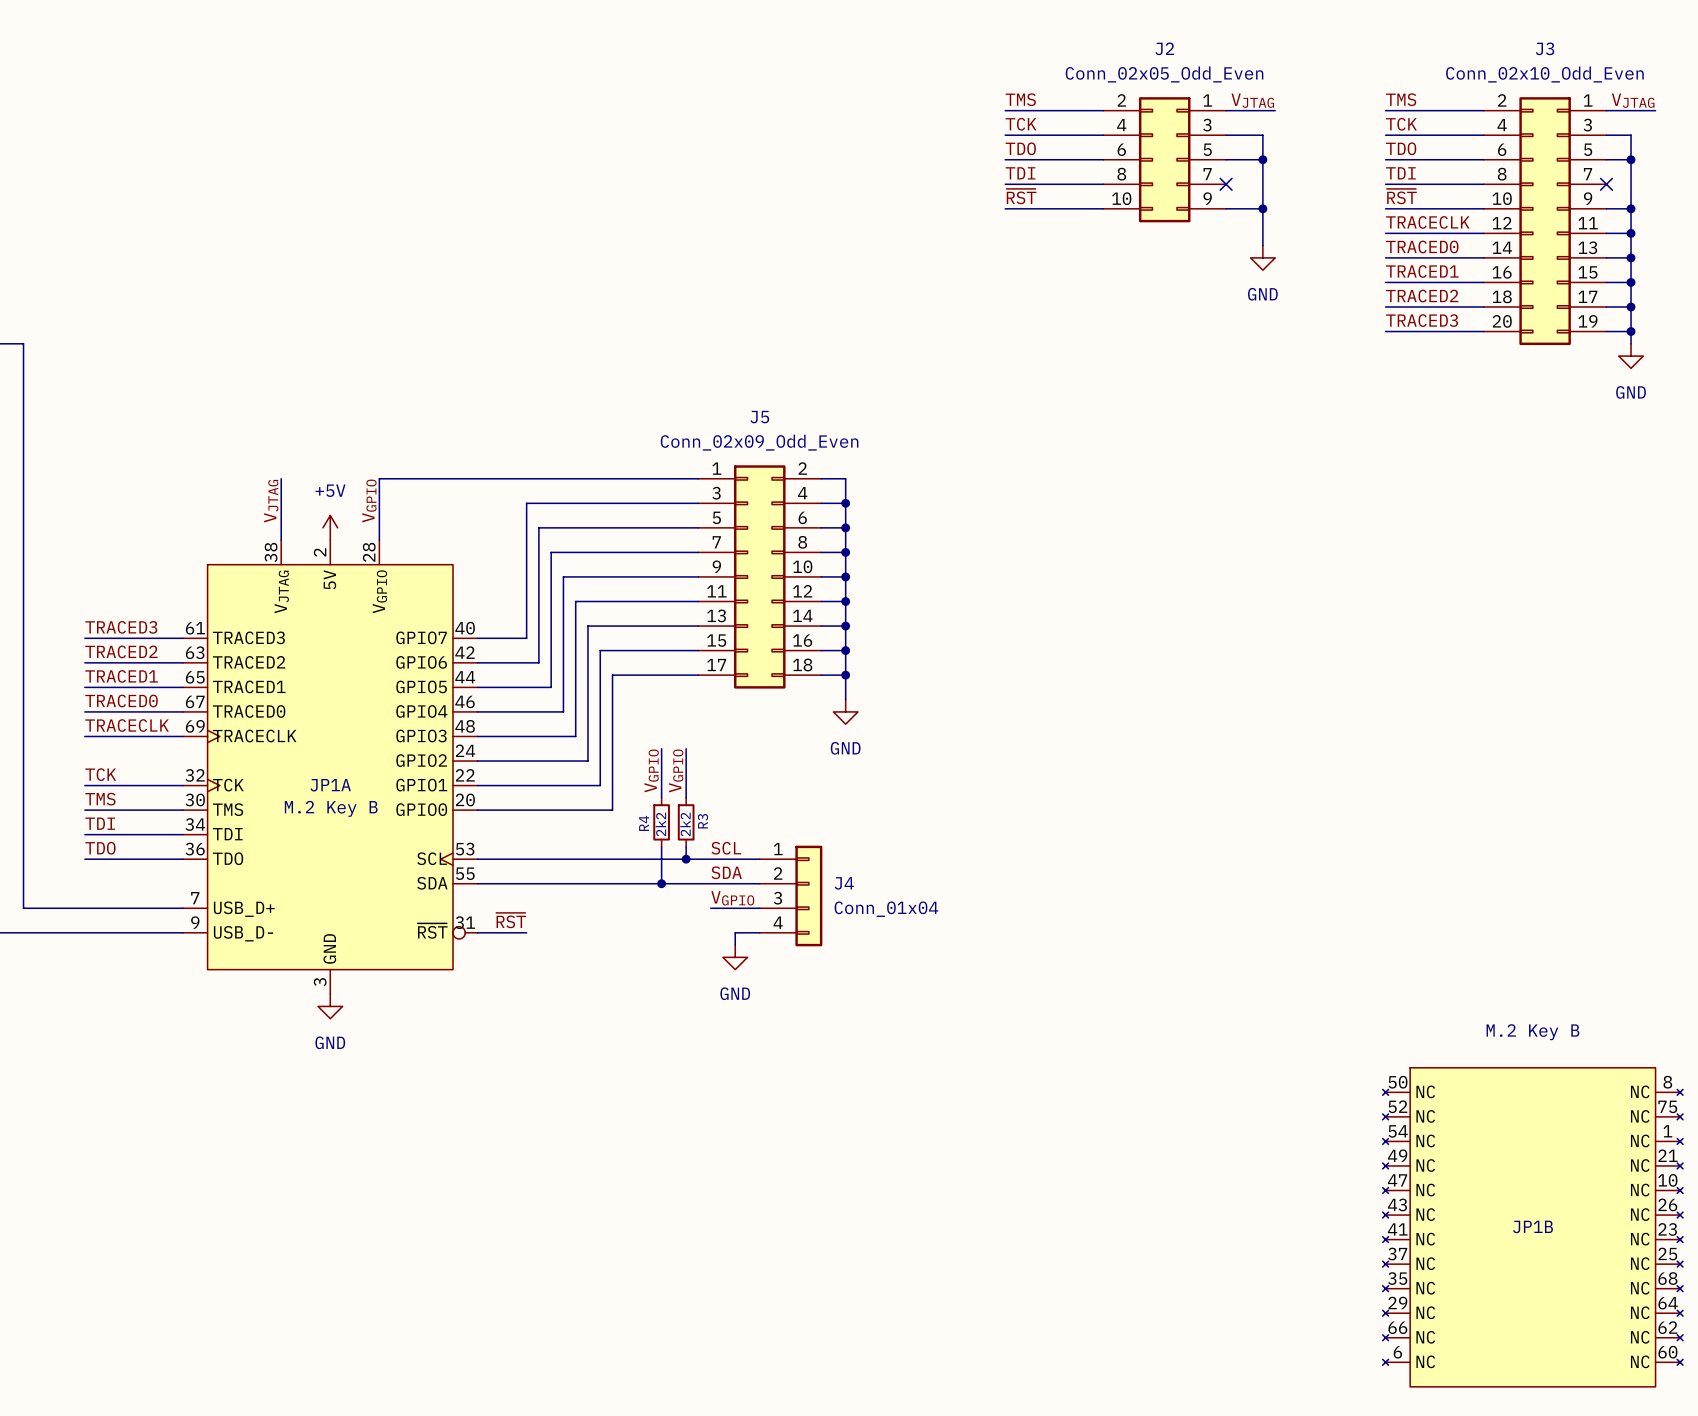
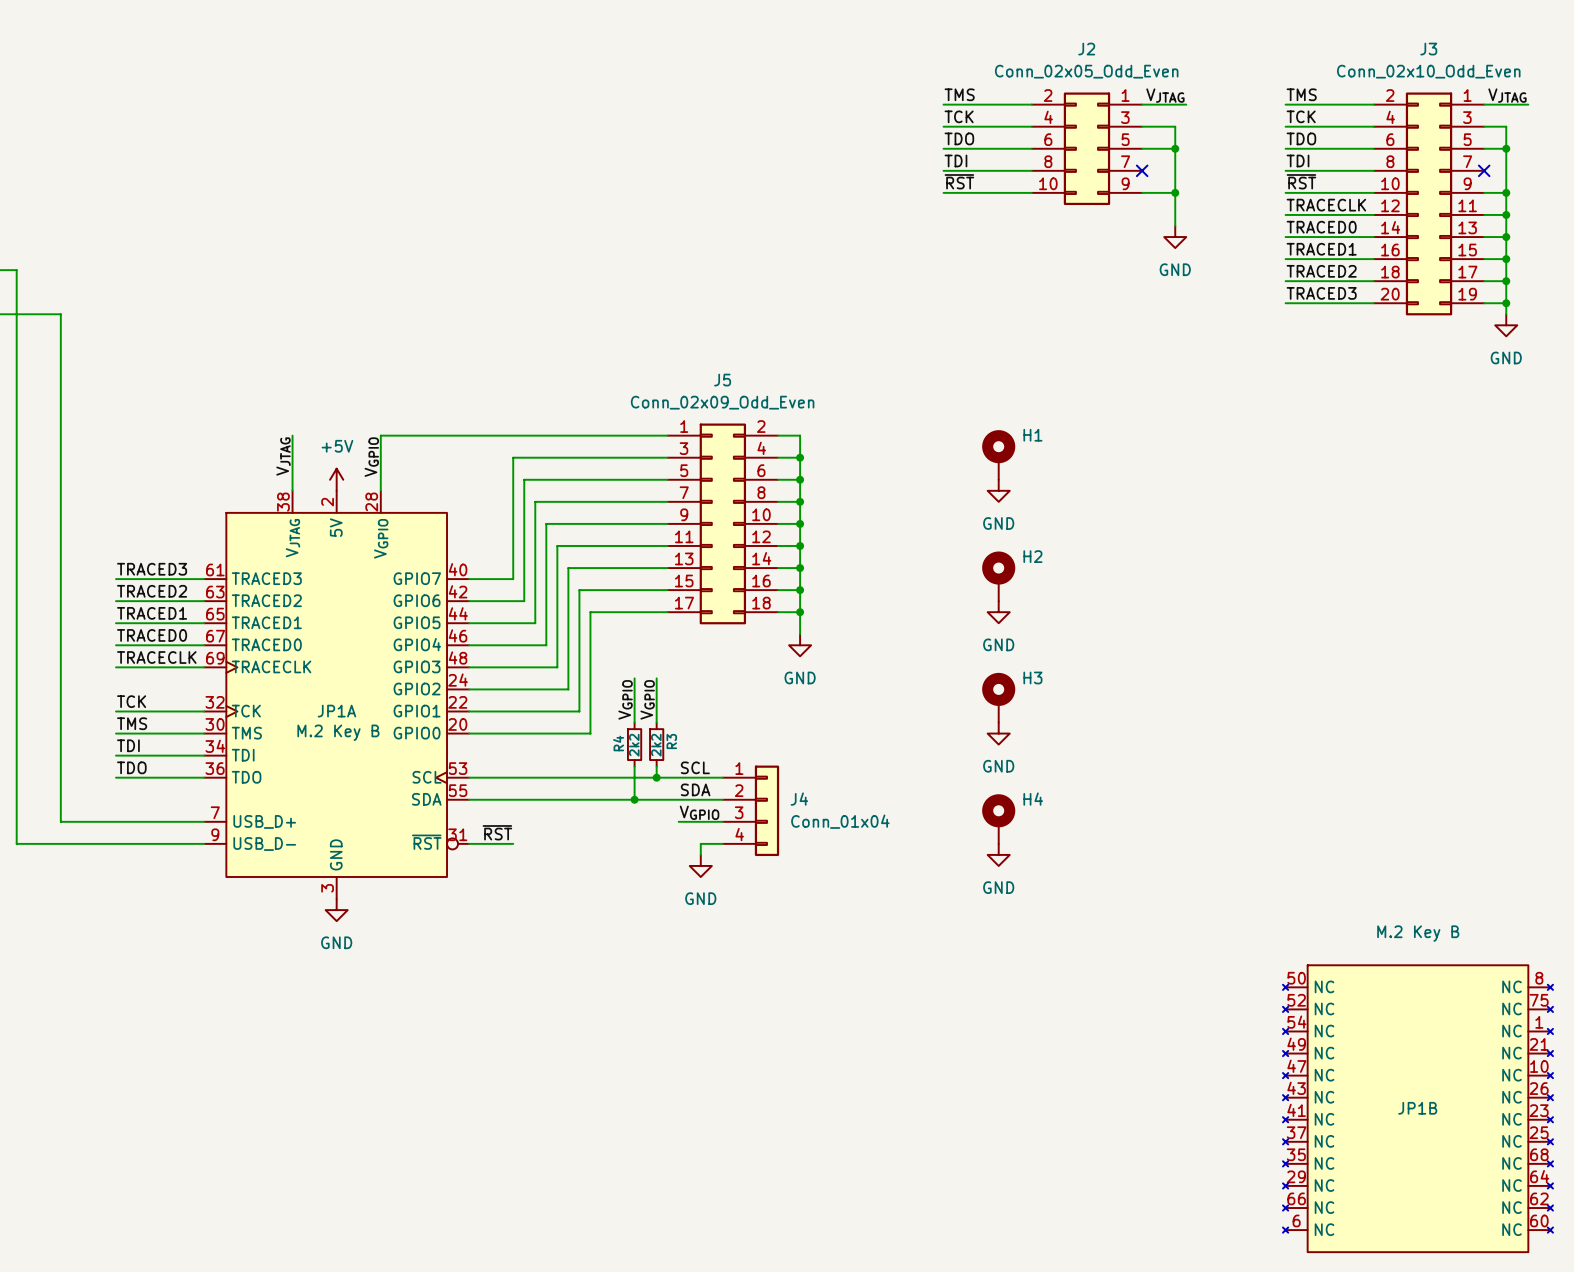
H1: none -> (998, 454)
power symbol: none -> GND (998, 490)
H2: none -> (998, 576)
power symbol: none -> GND (998, 612)
H3: none -> (998, 697)
power symbol: none -> GND (998, 733)
H4: none -> (998, 819)
power symbol: none -> GND (998, 854)

